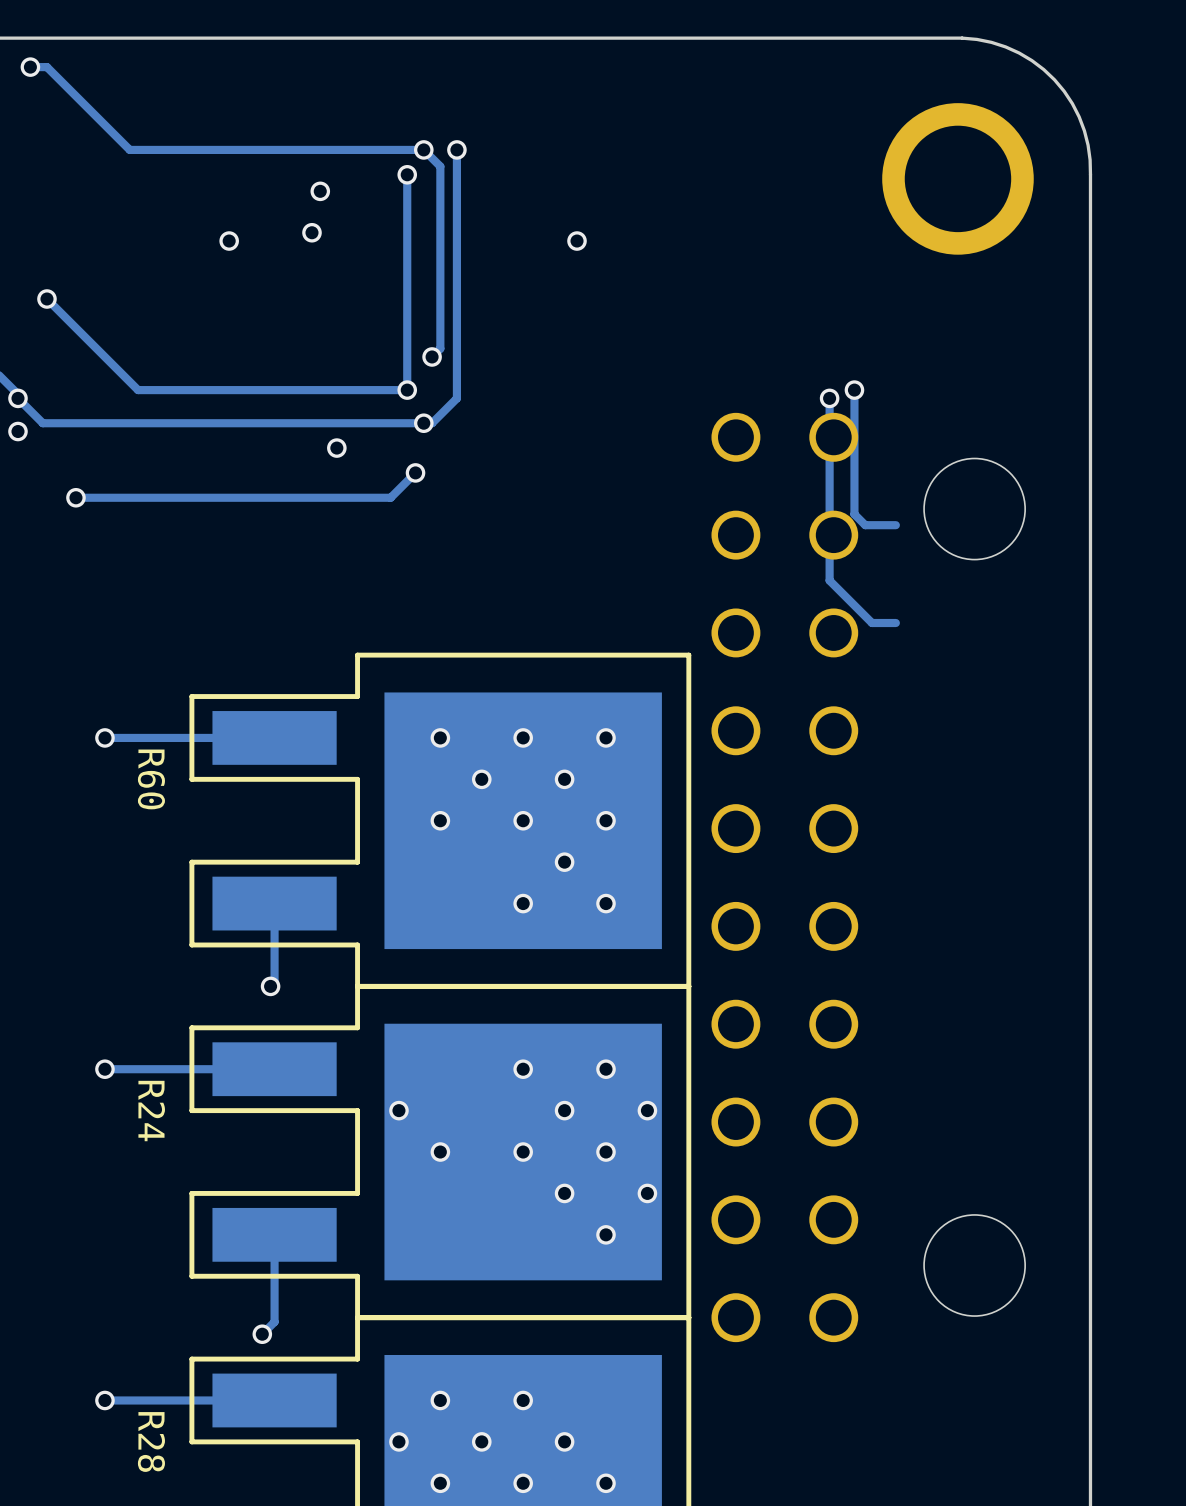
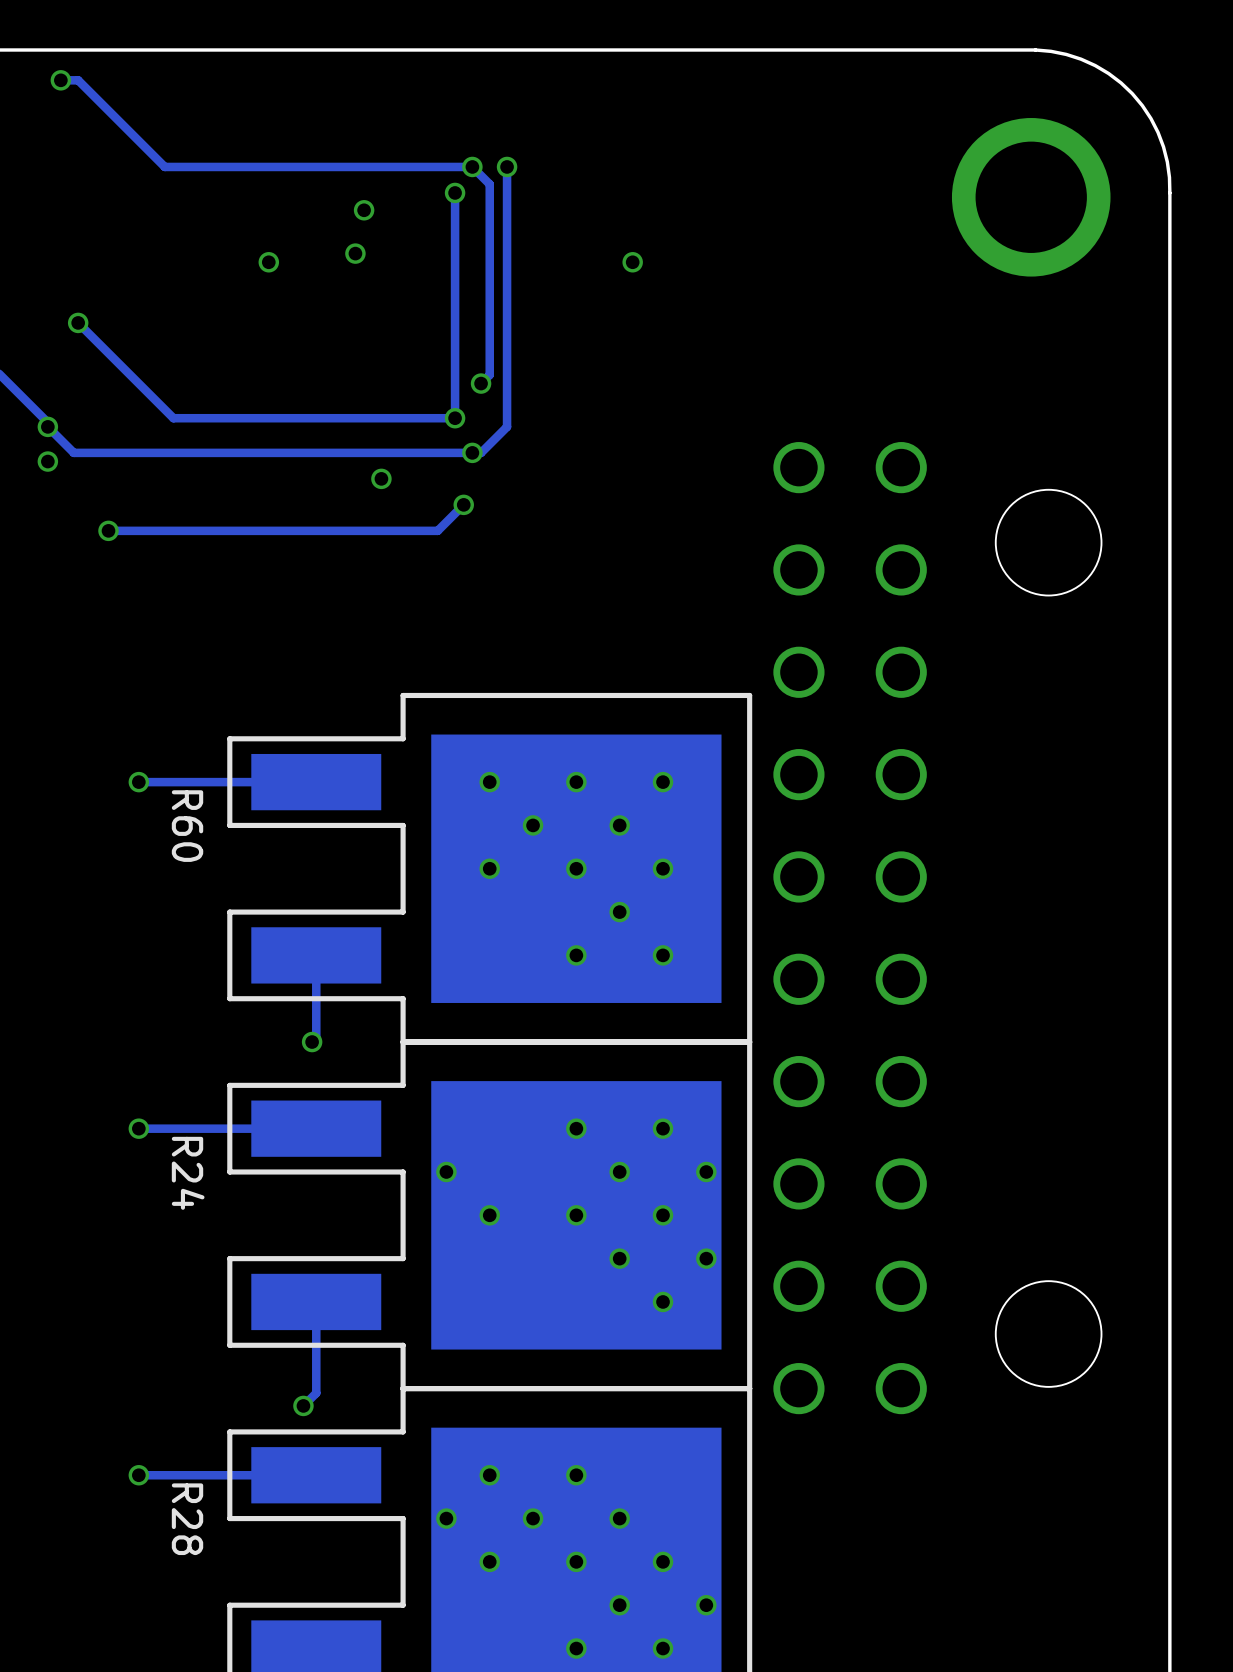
track: (854, 390) (854, 514) (865, 525) (895, 525) -> none
via: (854, 390) -> none
track: (829, 398) (829, 580) (872, 623) (895, 623) -> none
via: (829, 398) -> none

